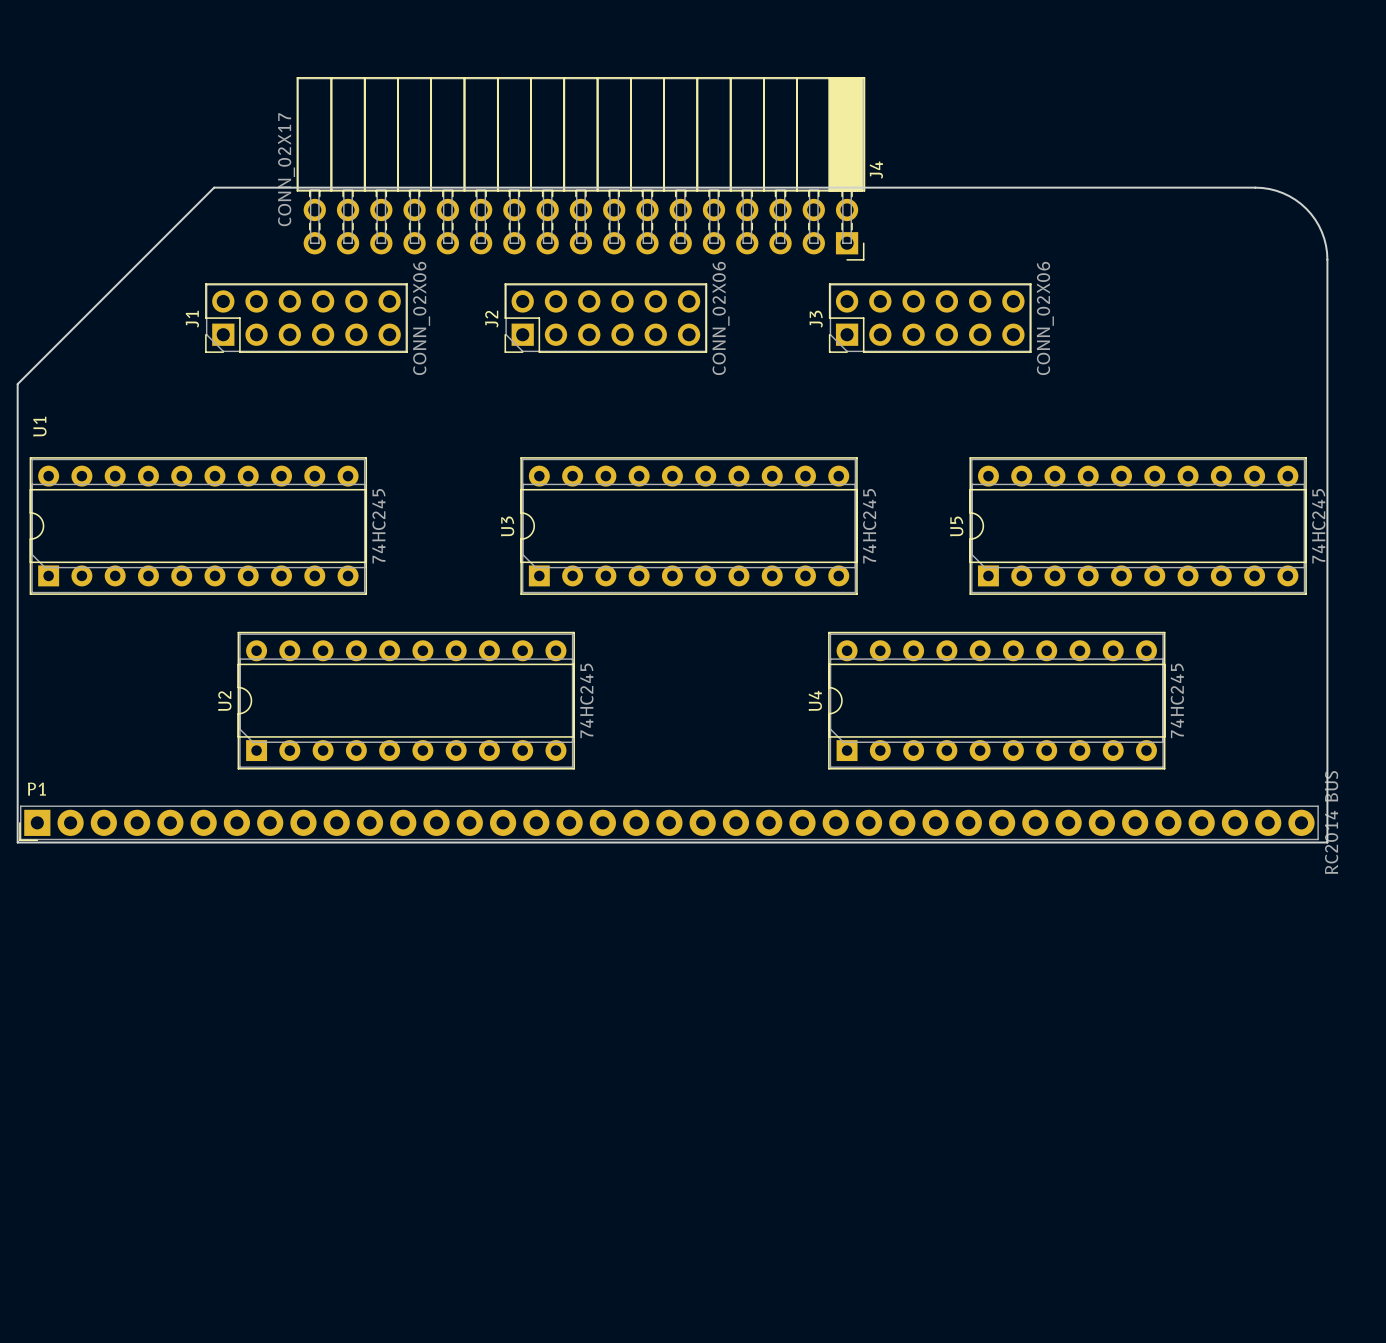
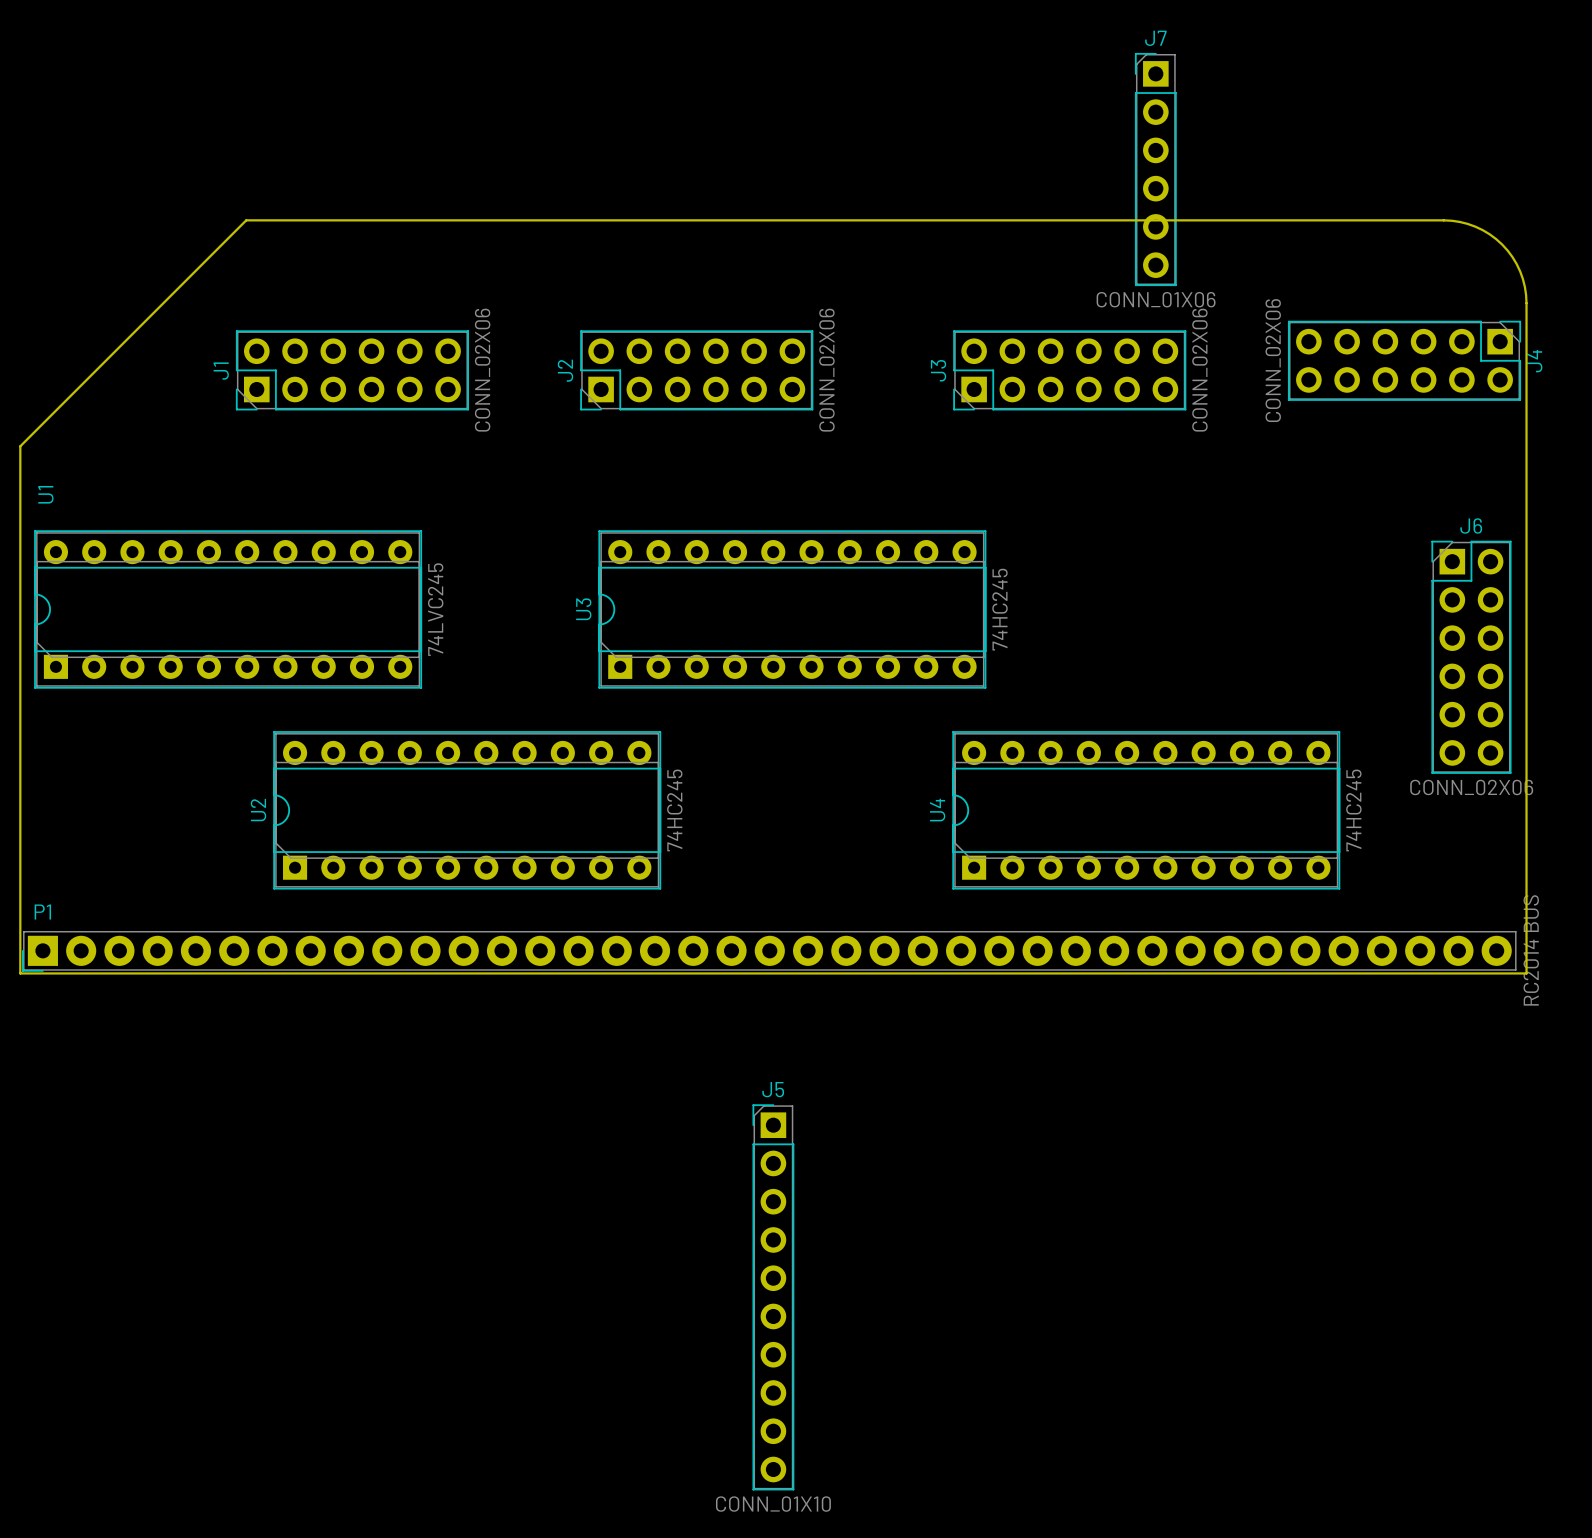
J4 footprint: [296, 77, 866, 261] -> [1287, 320, 1522, 401]
J7: none -> CONN_01X06 (1155, 169)
J4 value: CONN_02X17 (286, 169) -> CONN_02X06 (1273, 360)
J4 name position: J4 (876, 170) -> J4 (1534, 361)
U1 value: 74HC245 (378, 526) -> 74LVC245 (435, 609)
U5: 74HC245 (1138, 526) -> none
J6: none -> CONN_02X06 (1471, 657)
J5: none -> CONN_01X10 (773, 1297)

